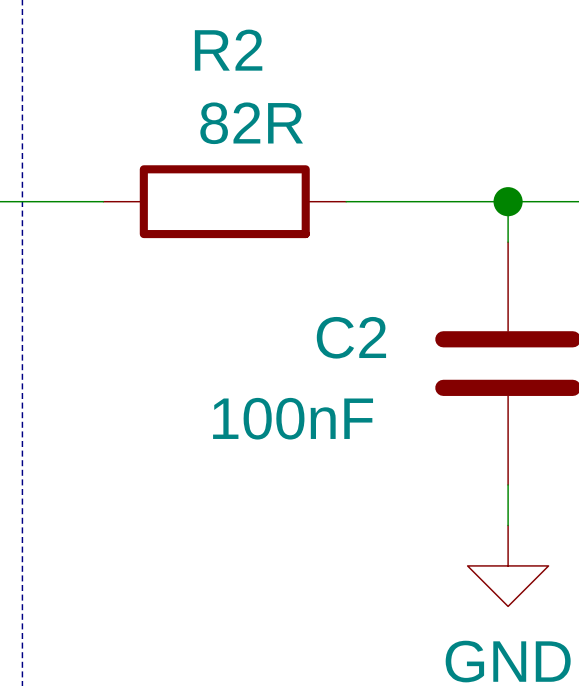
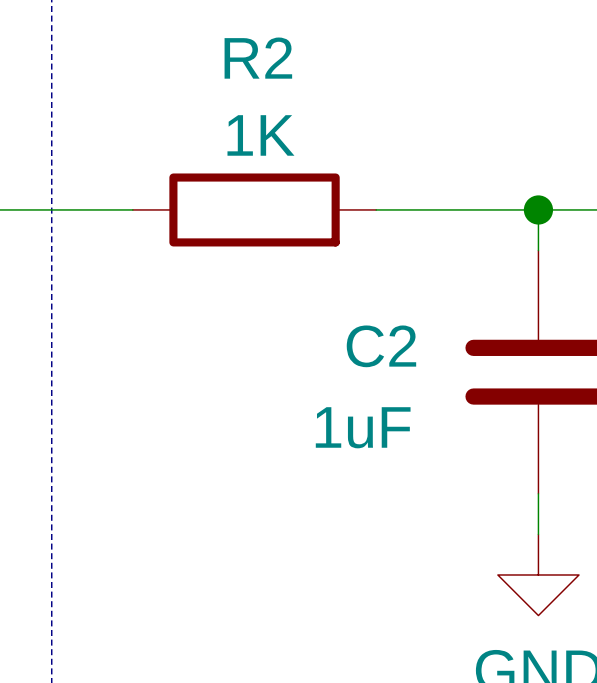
R2 value: 82R (251, 123) -> 1K (260, 135)
C2 value: 100nF (293, 418) -> 1uF (363, 427)

